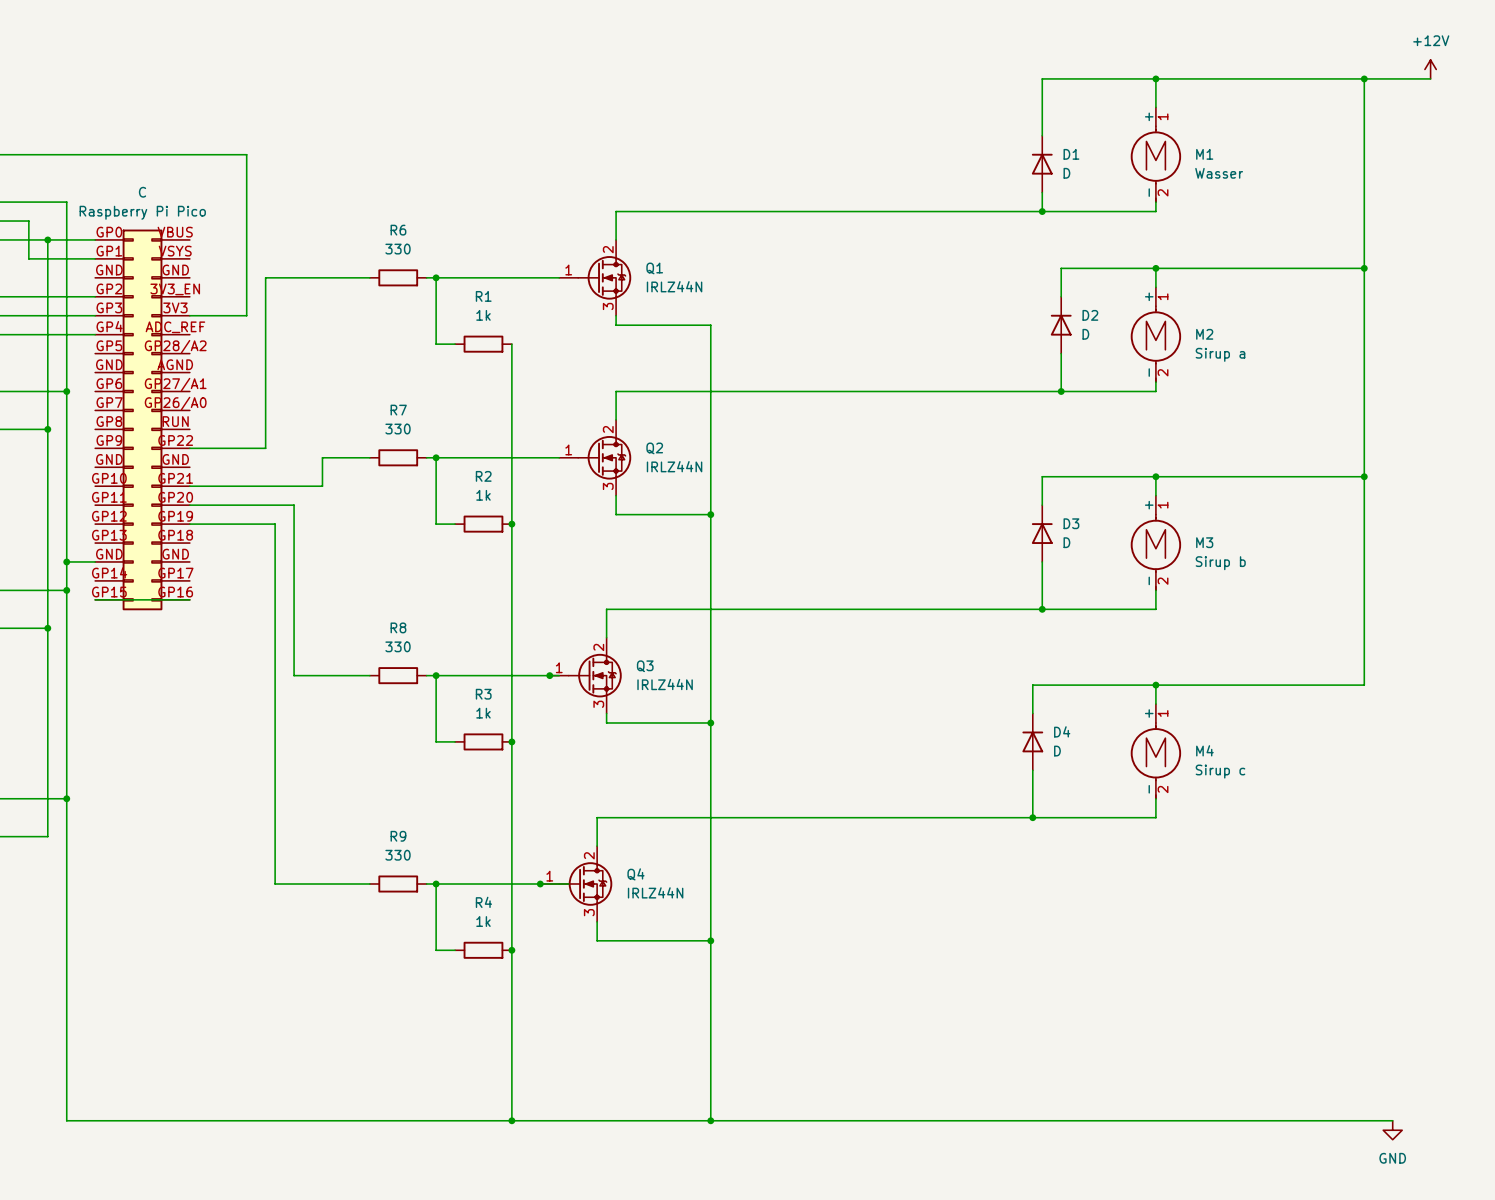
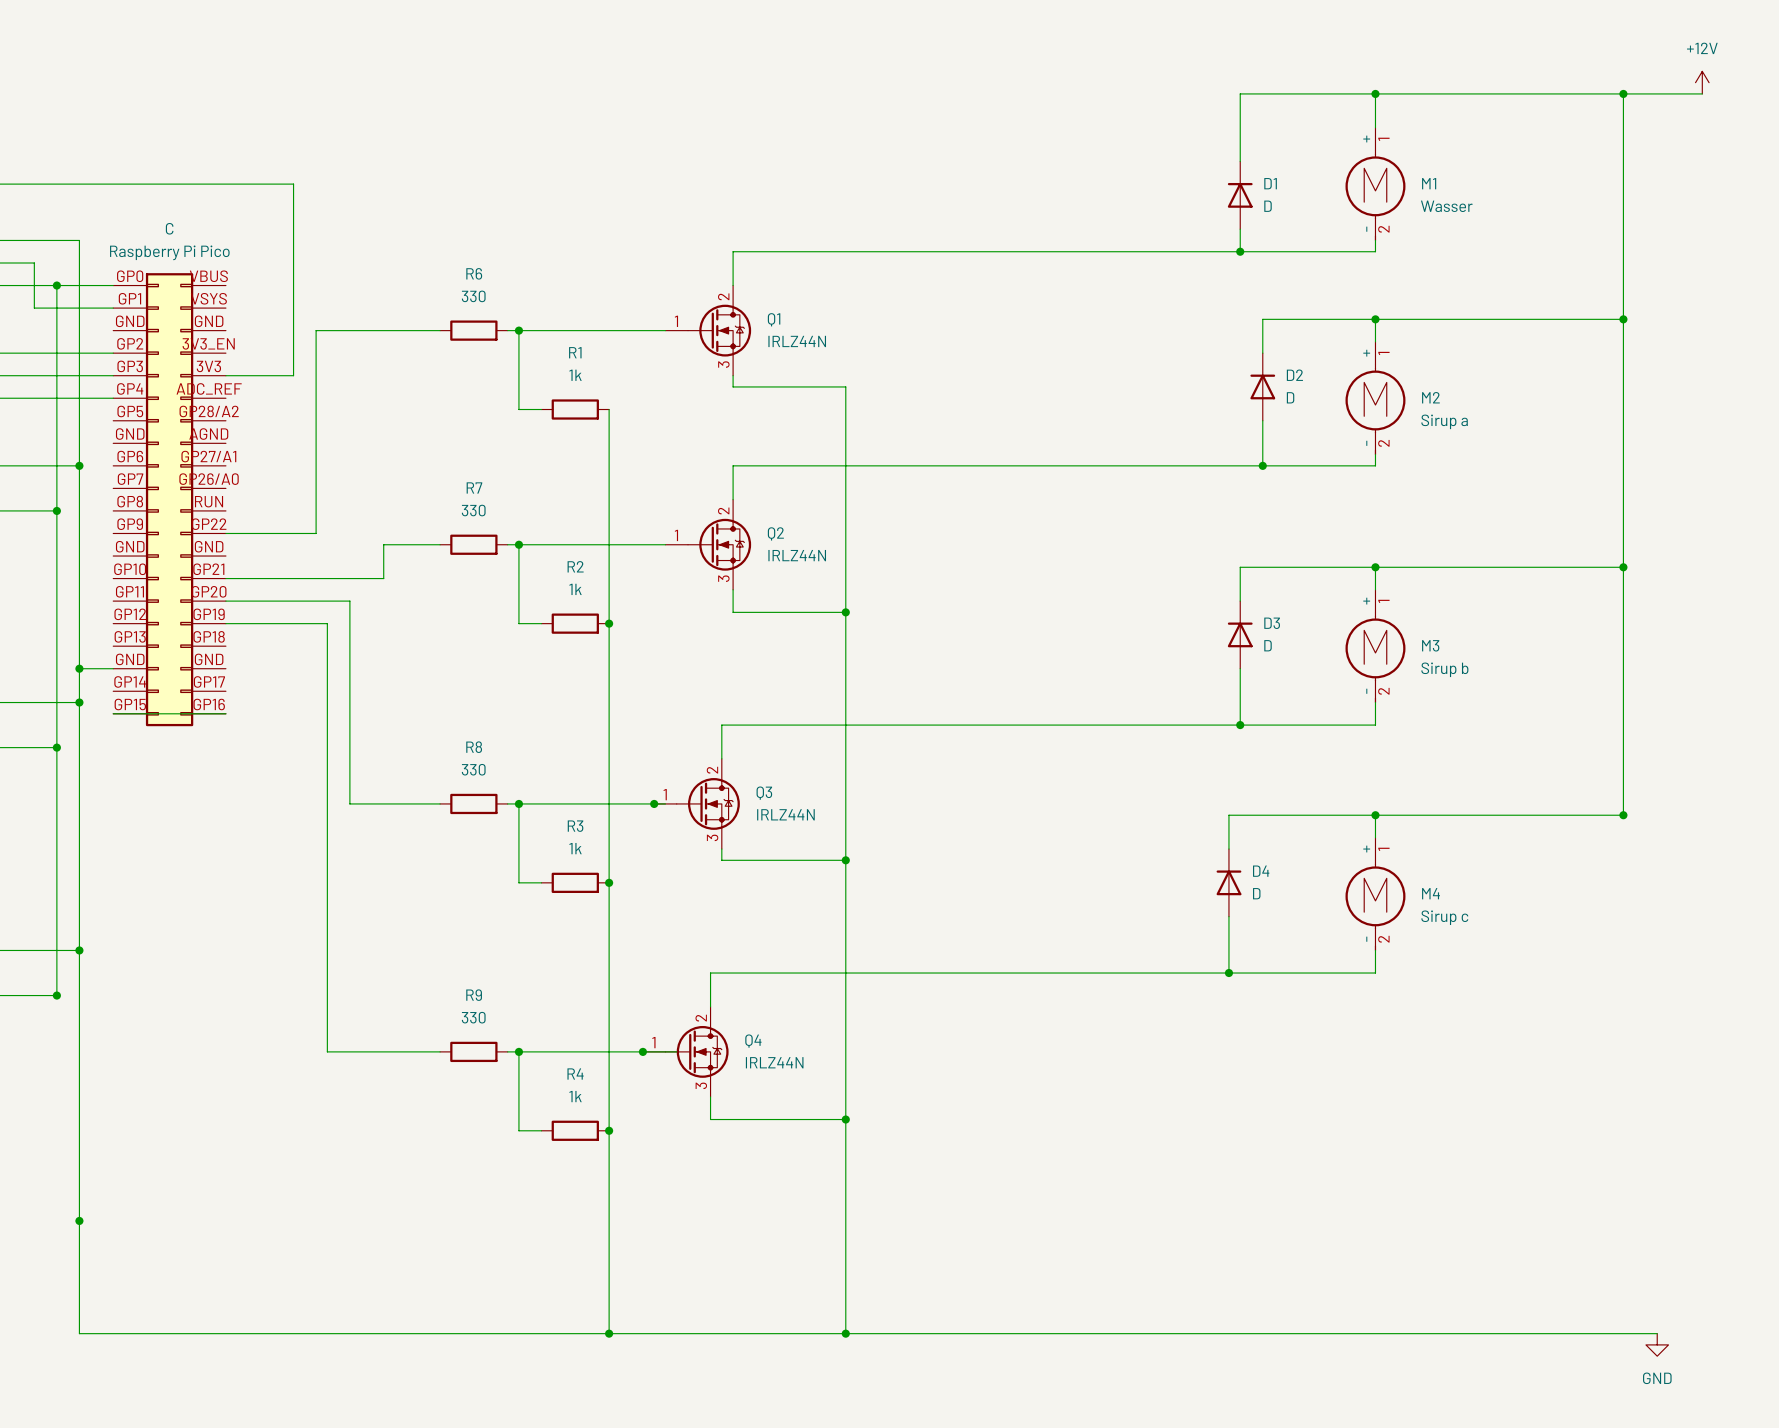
junction: none -> (1623, 815)
junction: none -> (56, 995)
junction: none -> (79, 1220)

